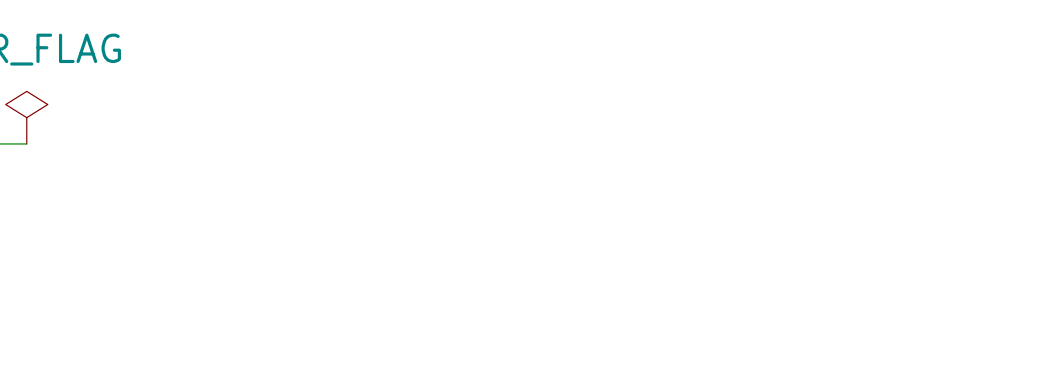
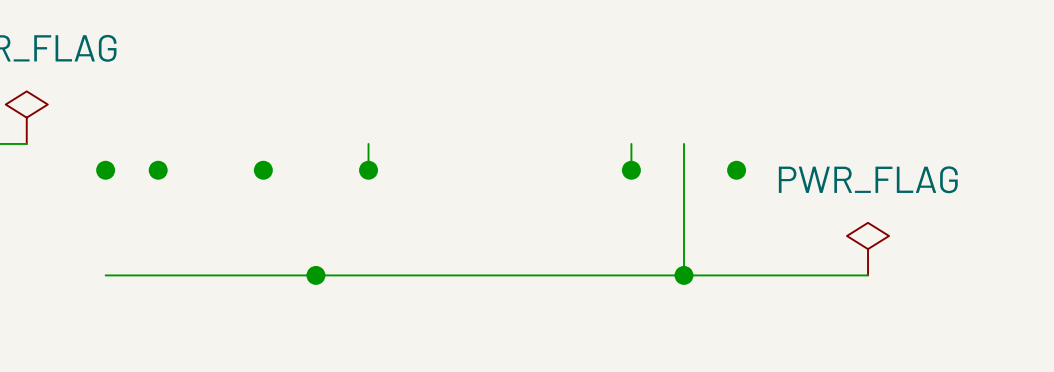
wire: none -> (368, 143) (368, 170)
wire: none -> (631, 143) (631, 170)
wire: none -> (683, 143) (683, 275)
junction: none -> (105, 170)
junction: none -> (158, 170)
junction: none -> (263, 170)
junction: none -> (368, 170)
junction: none -> (631, 170)
junction: none -> (736, 170)
power symbol: none -> PWR_FLAG (868, 249)
wire: none -> (105, 275) (868, 275)
junction: none -> (315, 275)
junction: none -> (683, 275)

